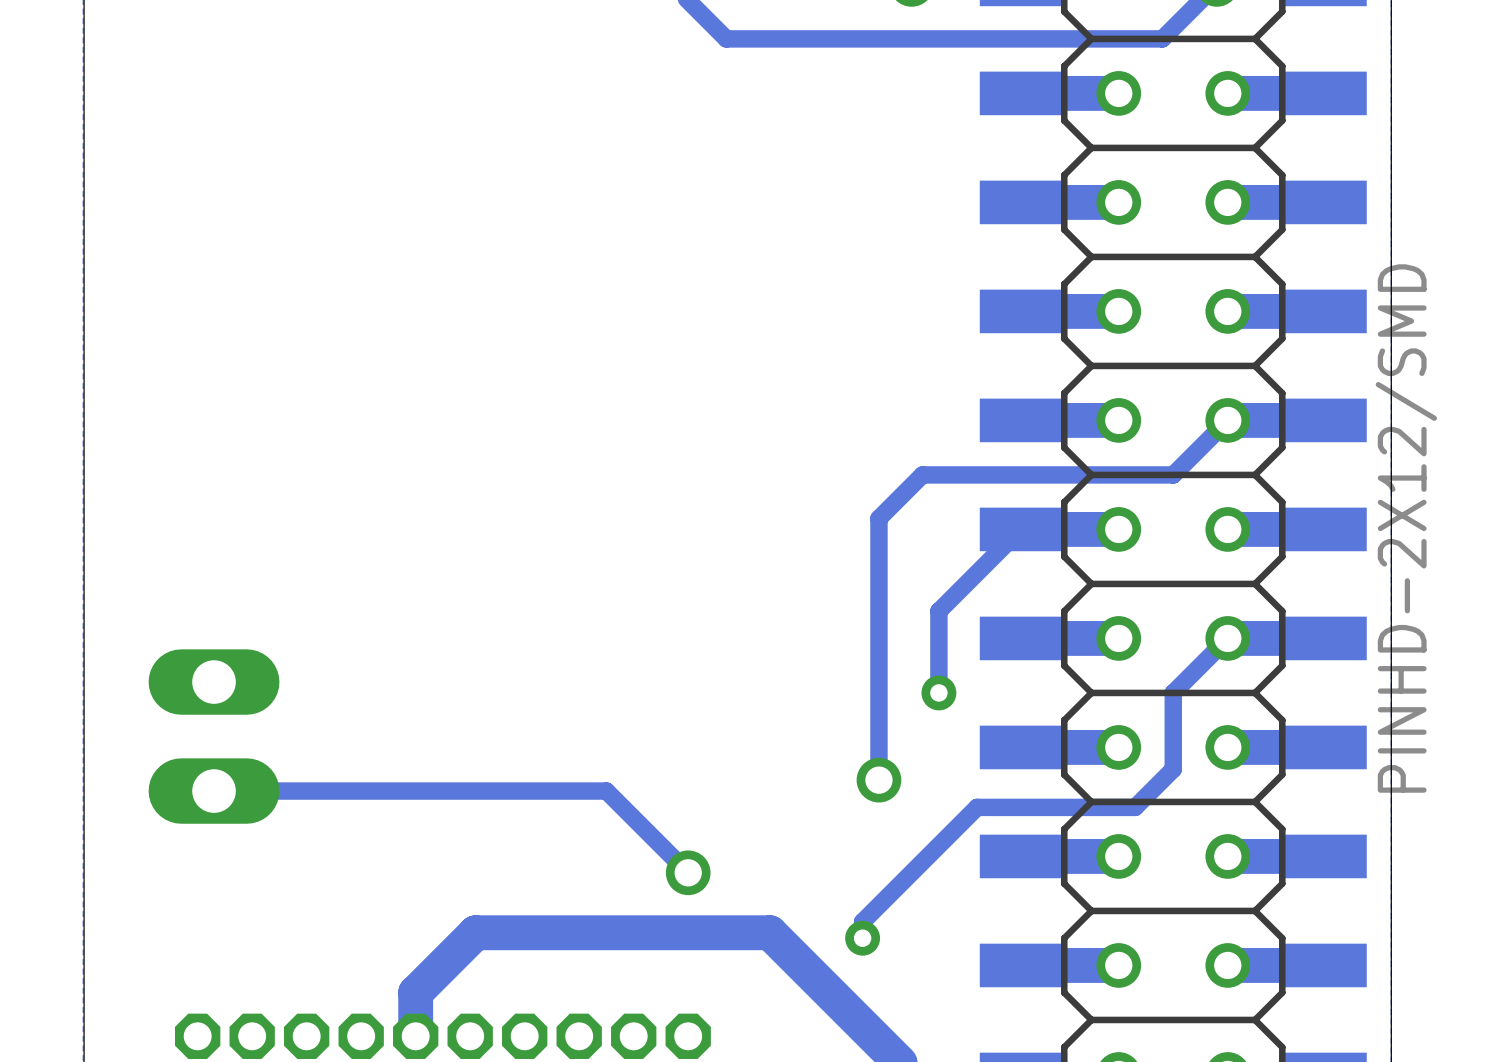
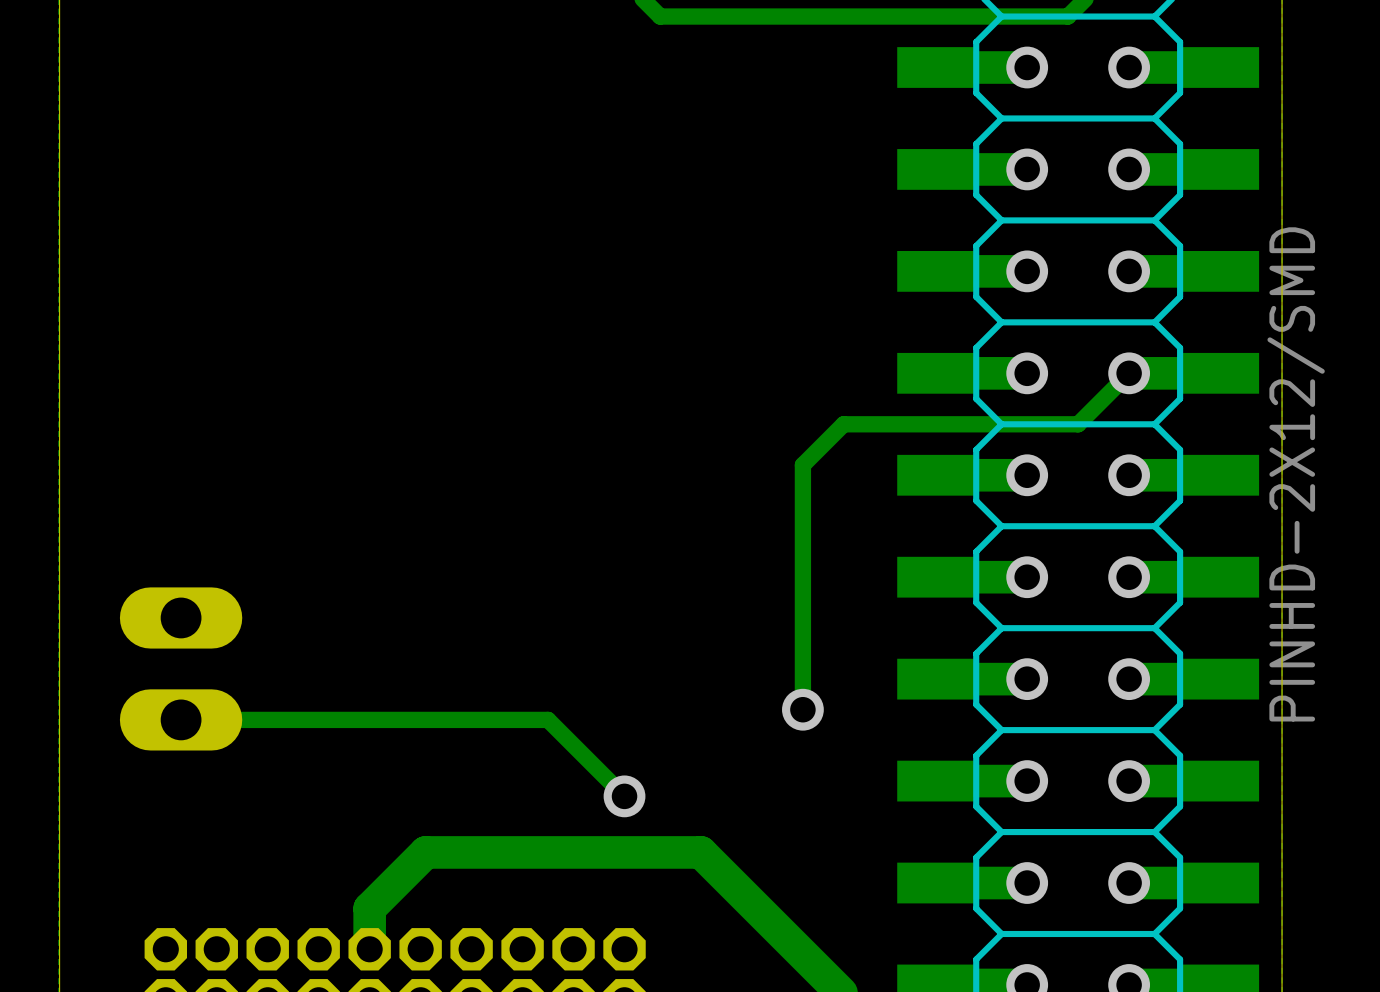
track: (1020, 529) (938, 611) (938, 692) -> none
track: (1227, 638) (1173, 692) (1173, 769) (1135, 807) (977, 807) (862, 921) (862, 938) -> none
via: (938, 692) -> none
via: (862, 938) -> none

